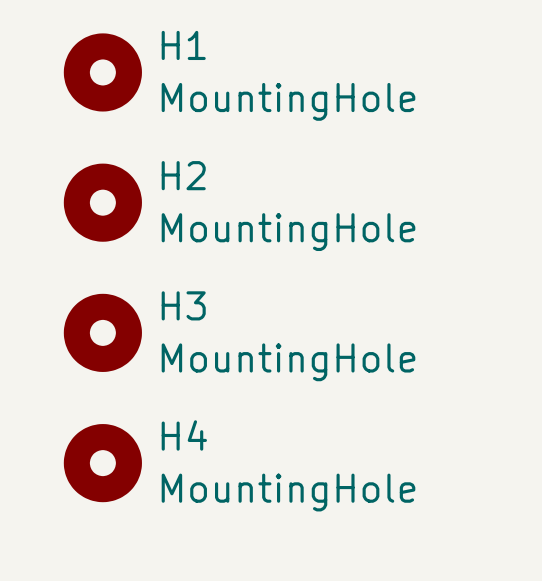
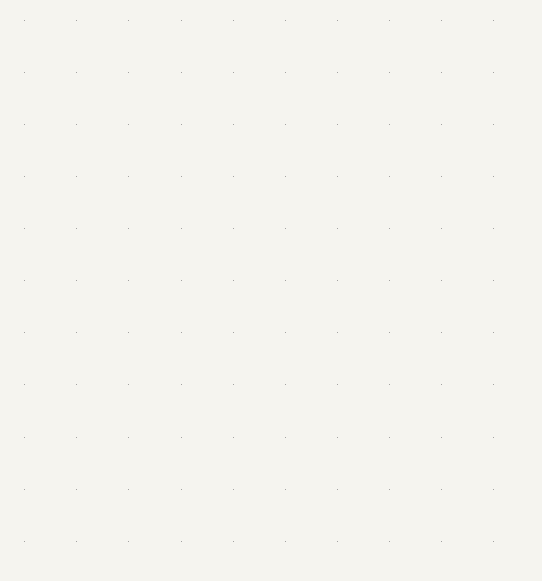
H1: MountingHole (102, 72) -> none
H2: MountingHole (102, 202) -> none
H3: MountingHole (102, 332) -> none
H4: MountingHole (102, 463) -> none

